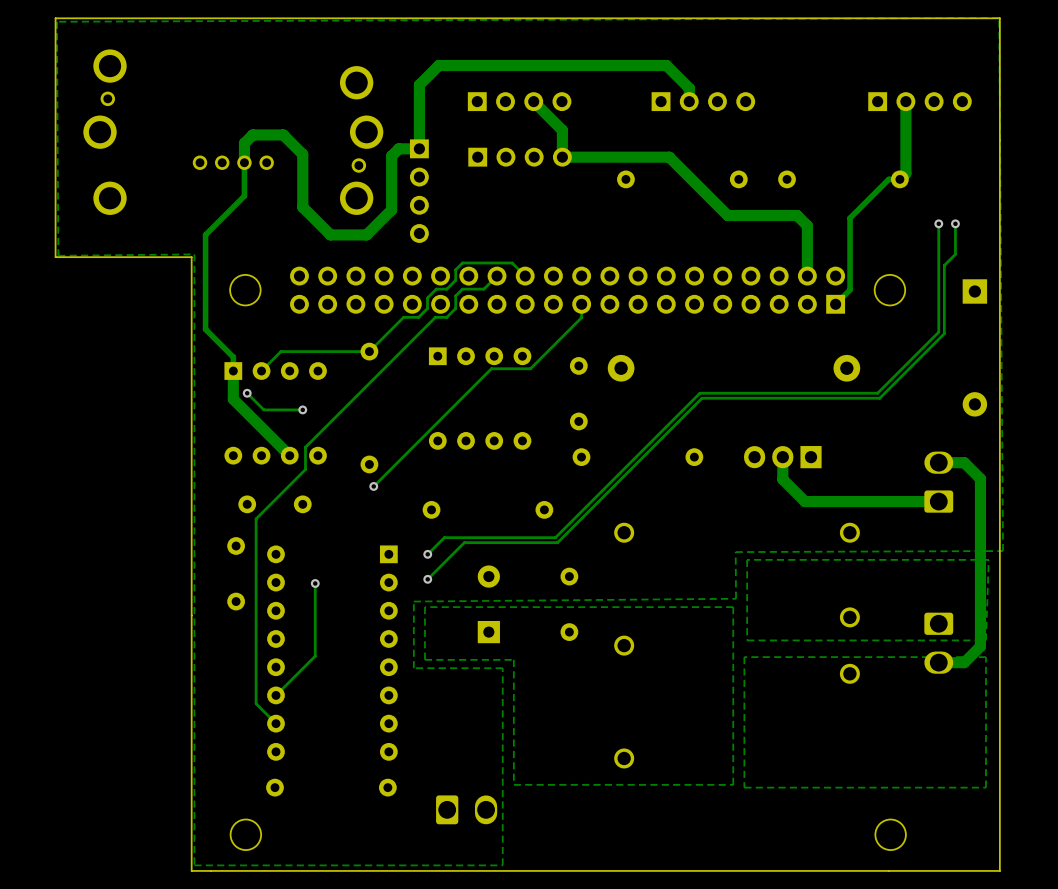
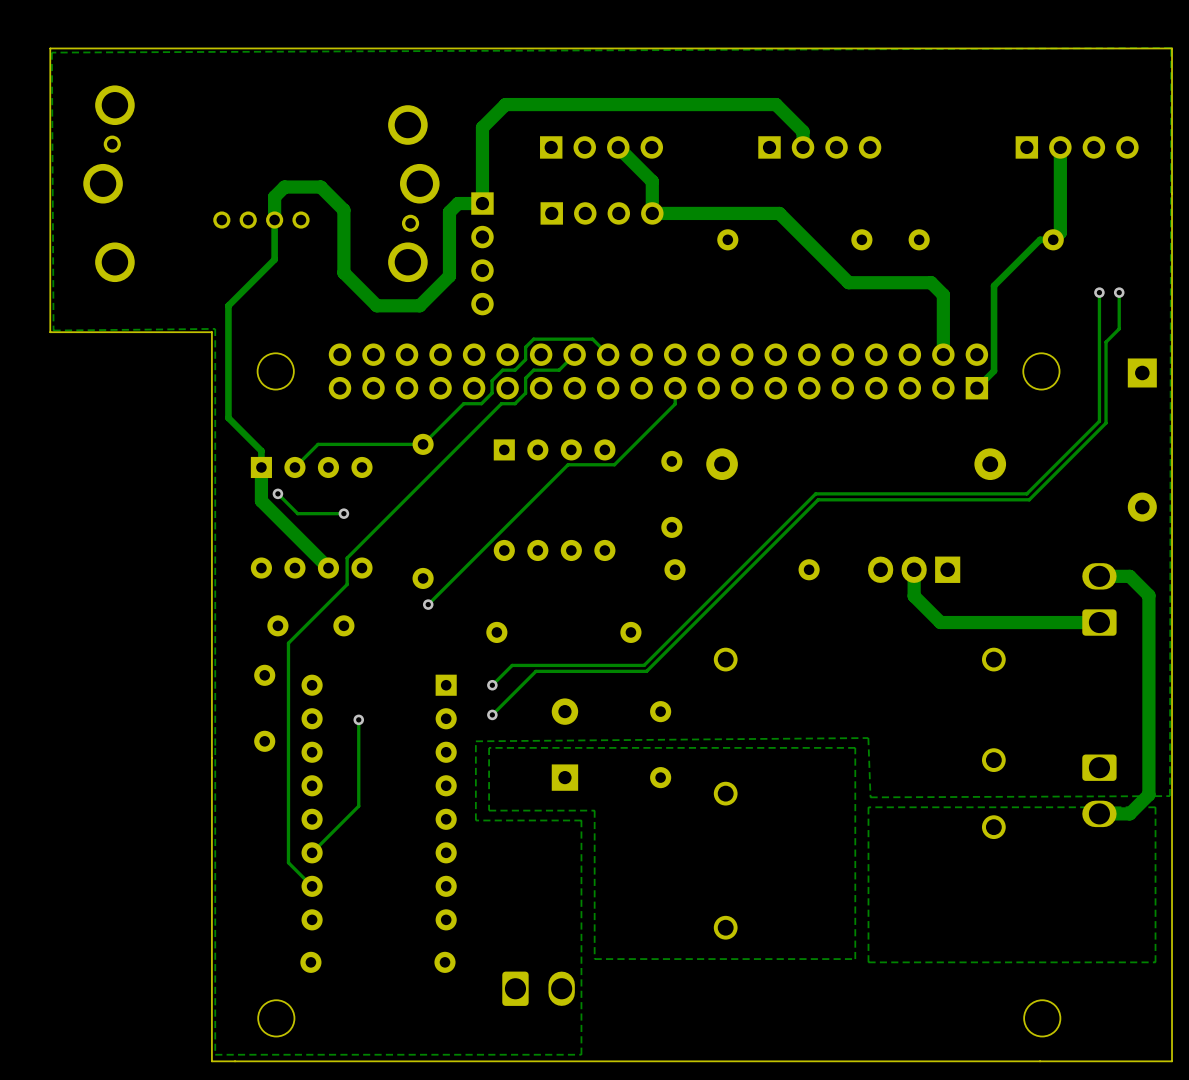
zone outline: (999, 17) (1003, 551) (735, 552) (736, 598) (413, 601) -> (1171, 48) (1169, 796) (870, 797) (868, 738) (475, 741)
zone outline: (988, 559) (985, 640) (747, 640) (747, 559) (988, 559) -> none

